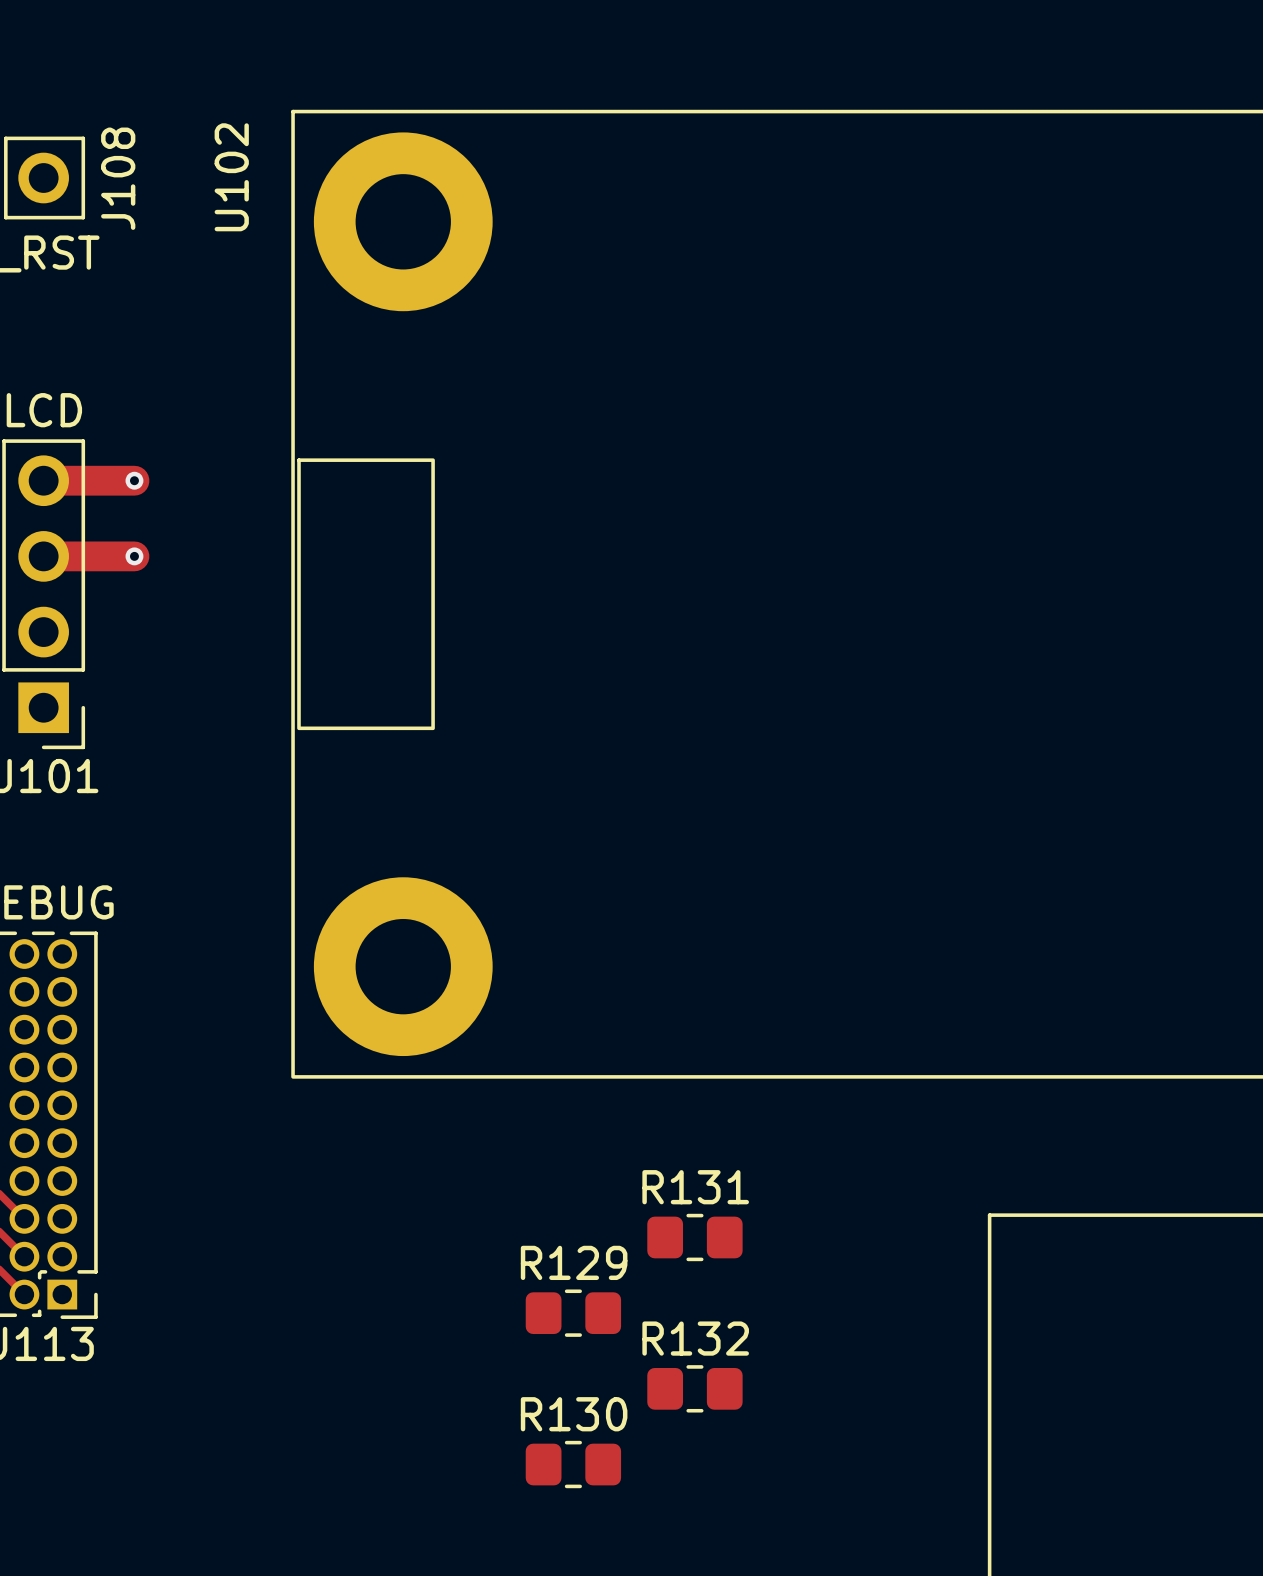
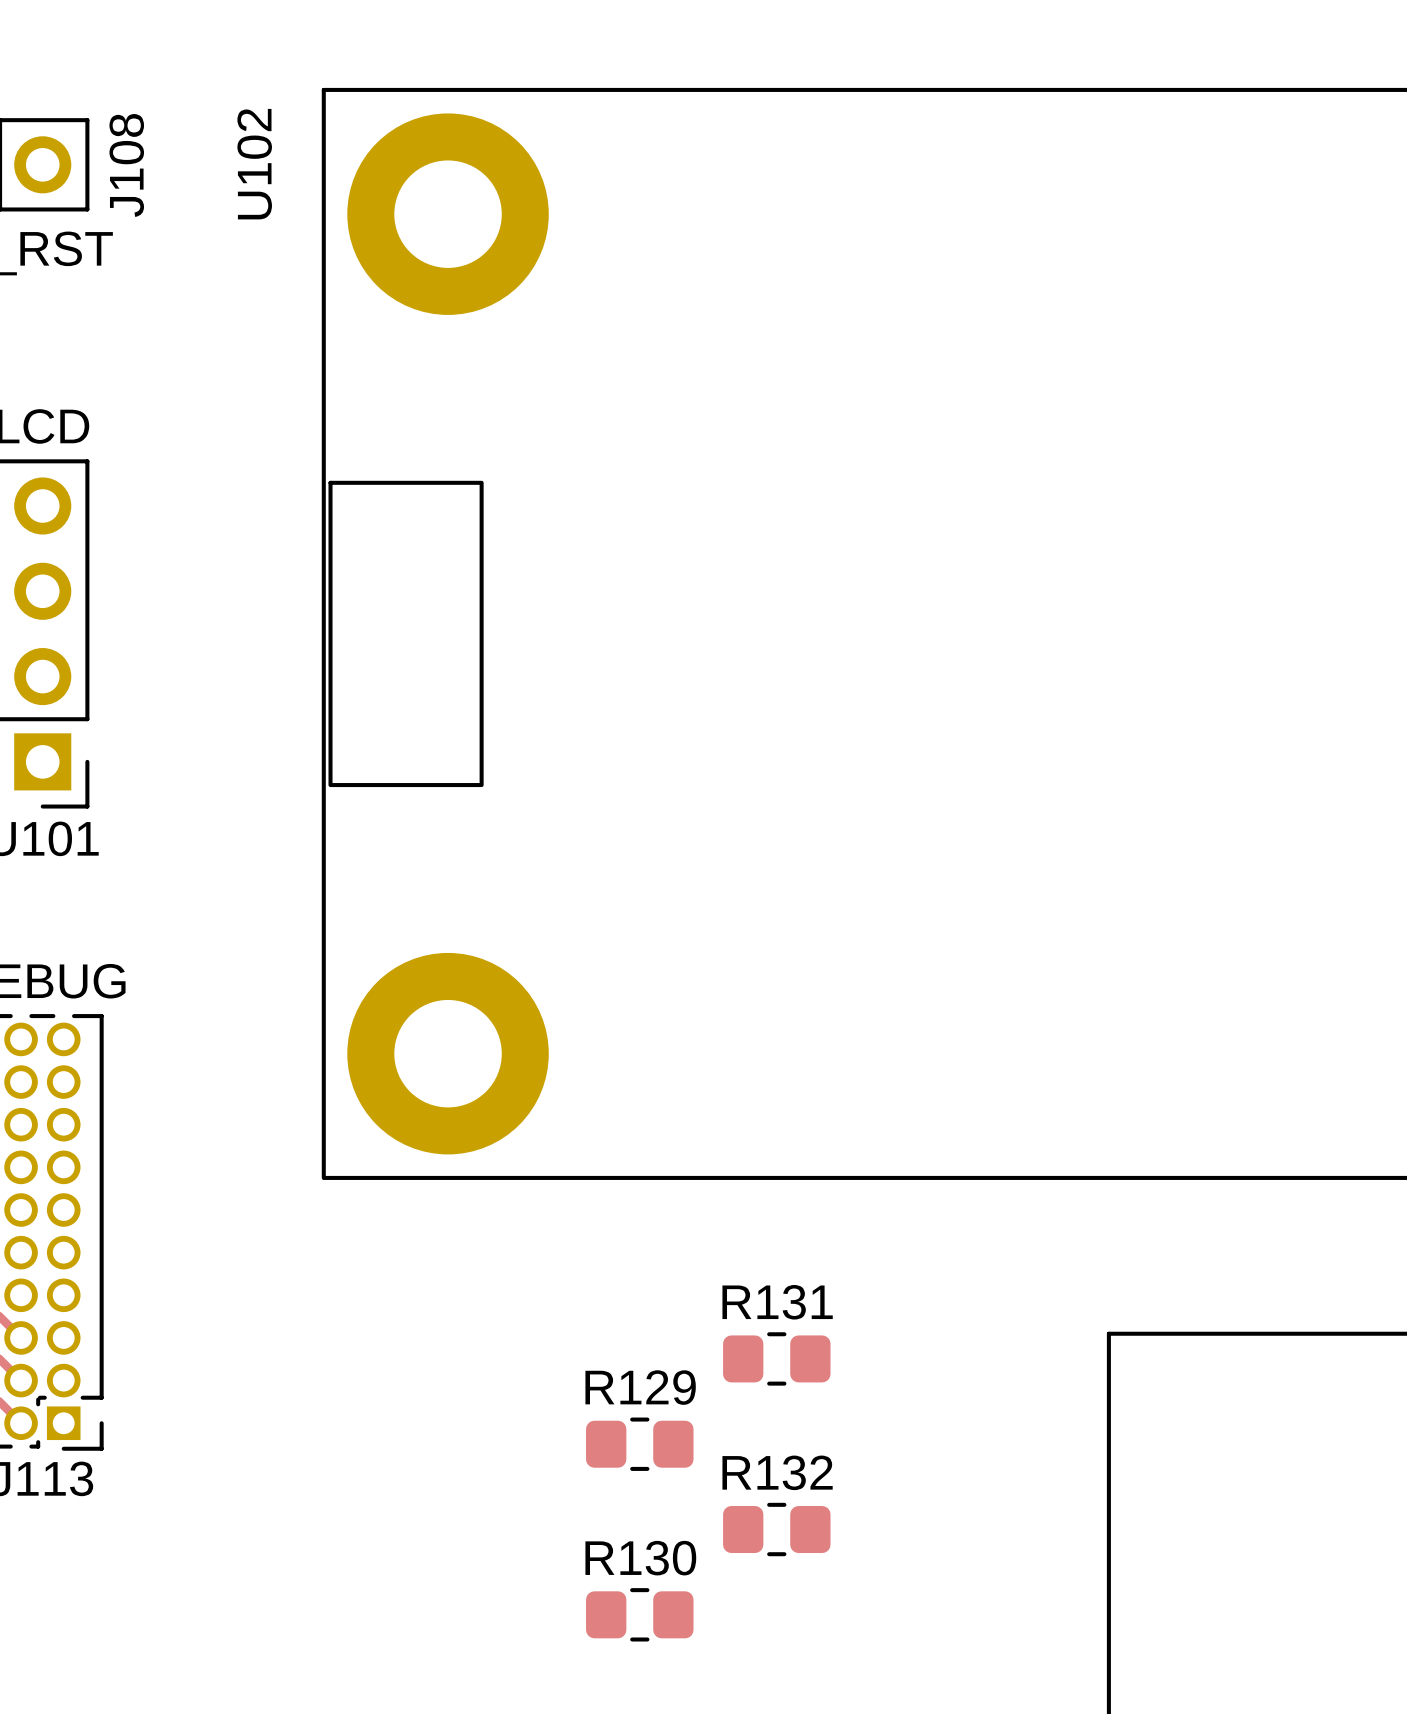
track: (43, 480) (134, 480) -> none
via: (134, 480) -> none
track: (43, 556) (134, 556) -> none
via: (134, 556) -> none

